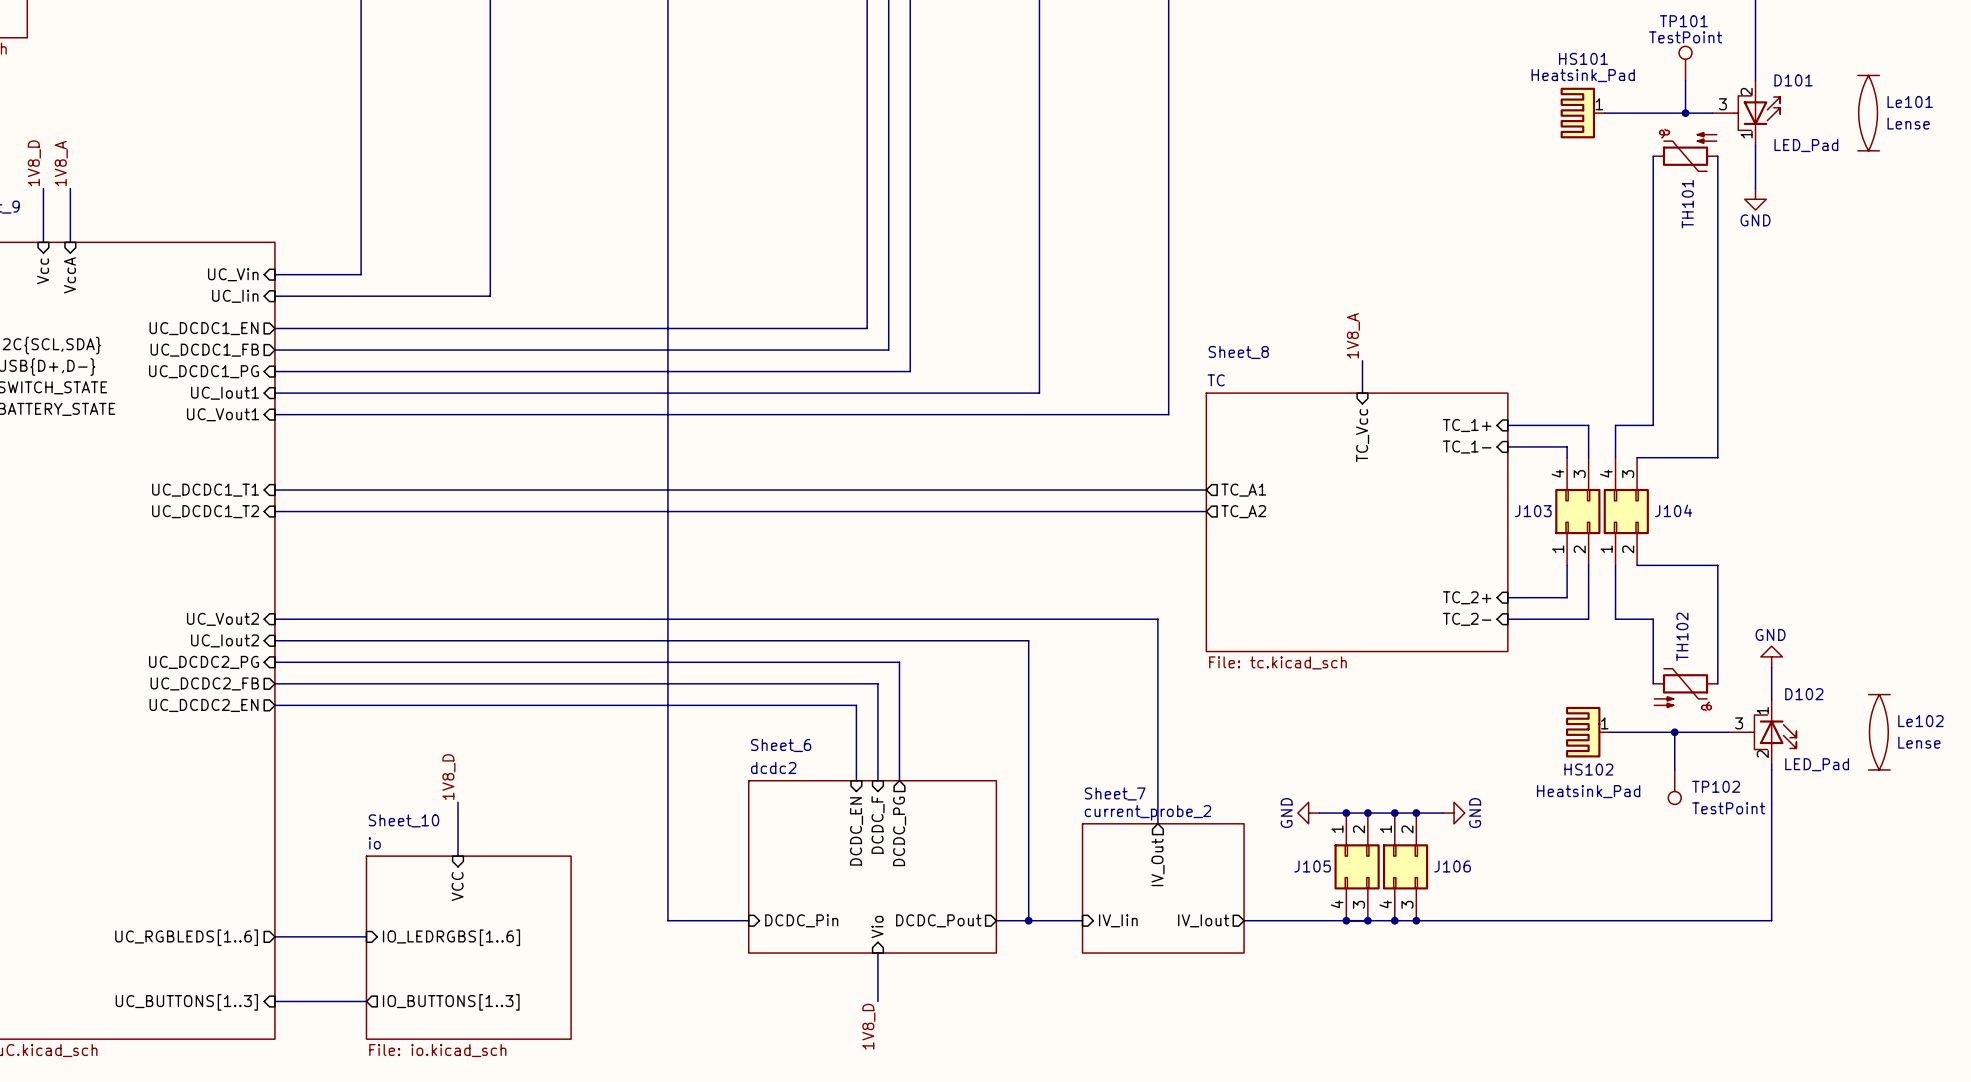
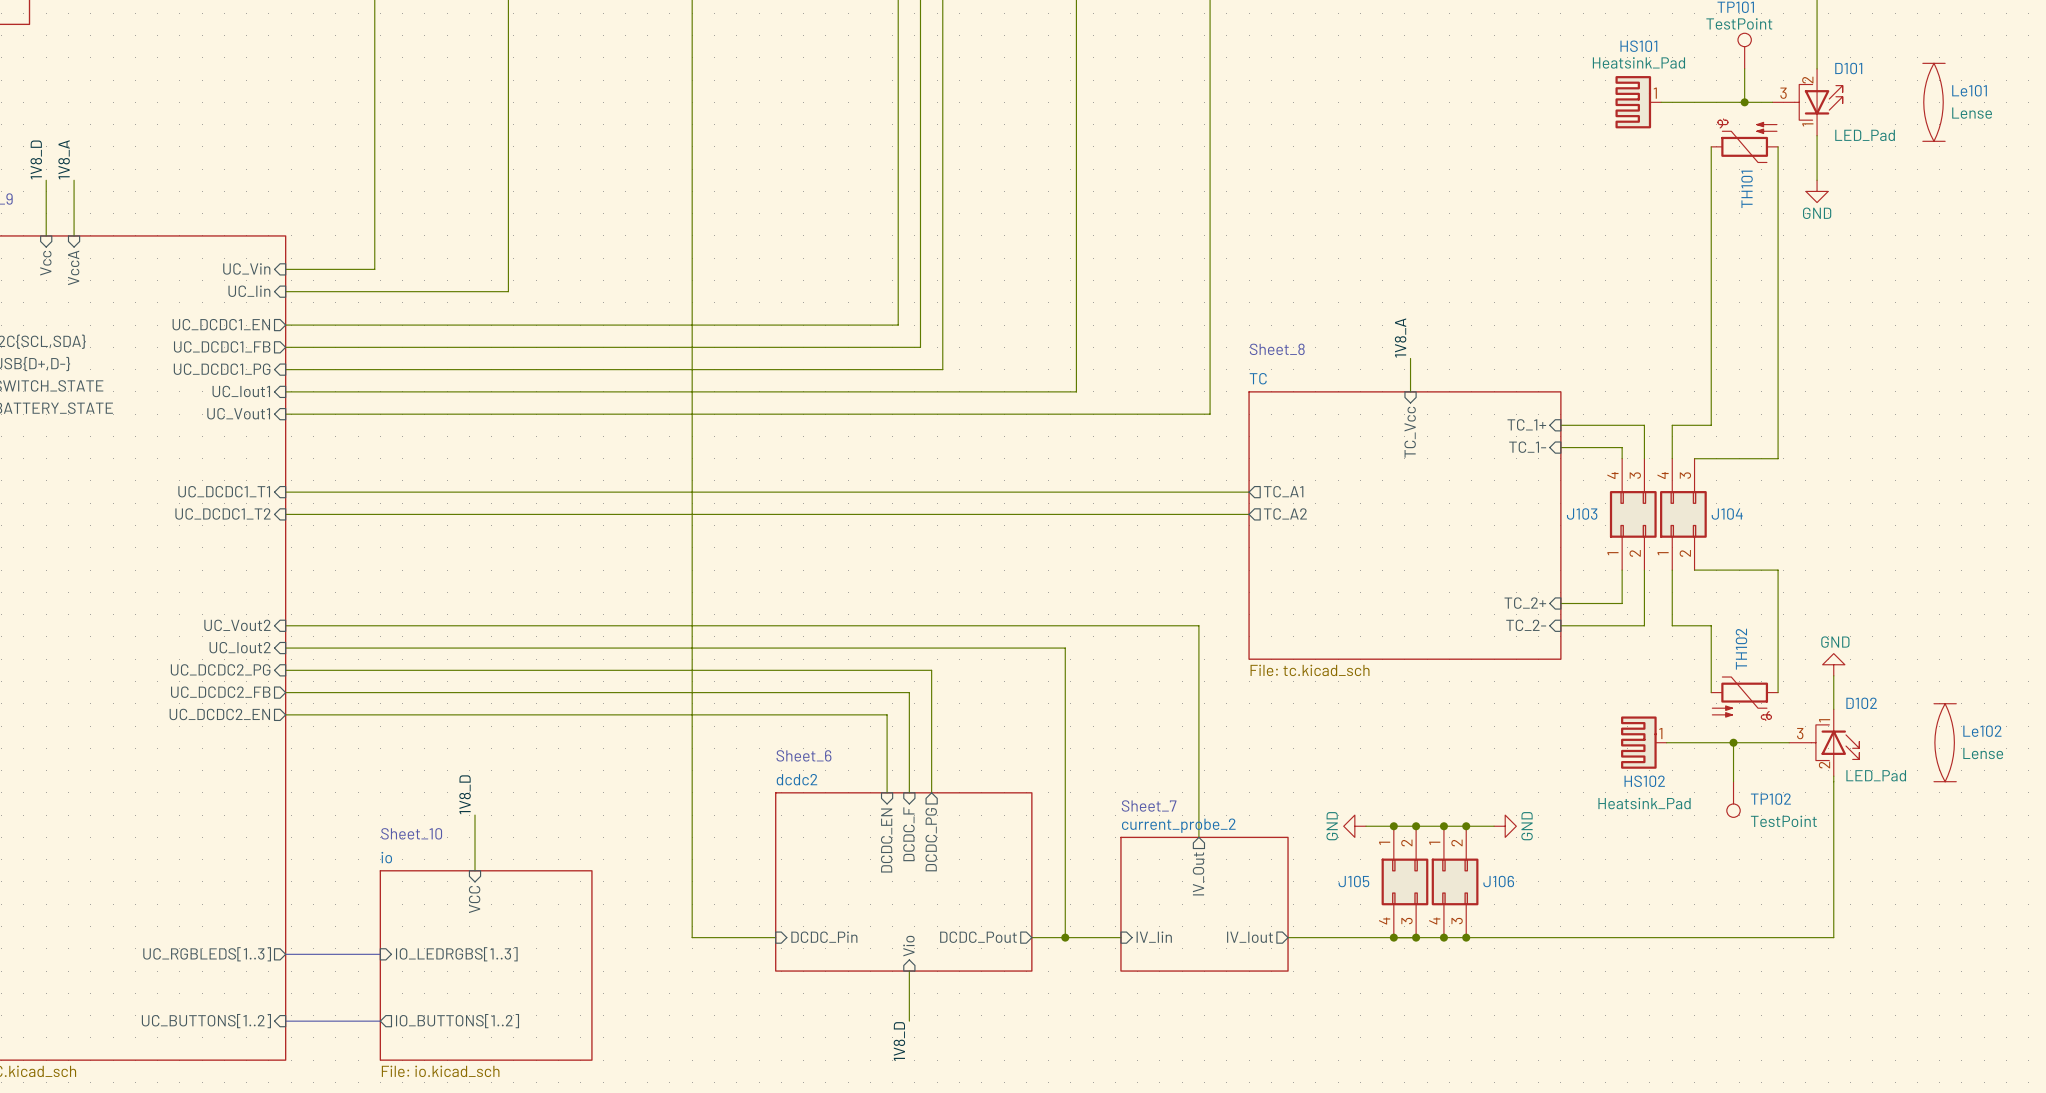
sheet pin: UC_RGBLEDS[1..6] (186, 937) -> UC_RGBLEDS[1..3] (207, 954)
sheet pin: IO_LEDRGBS[1..6] (451, 937) -> IO_LEDRGBS[1..3] (456, 954)
sheet pin: UC_BUTTONS[1..3] (186, 1002) -> UC_BUTTONS[1..2] (206, 1021)
sheet pin: IO_BUTTONS[1..3] (451, 1002) -> IO_BUTTONS[1..2] (457, 1021)

